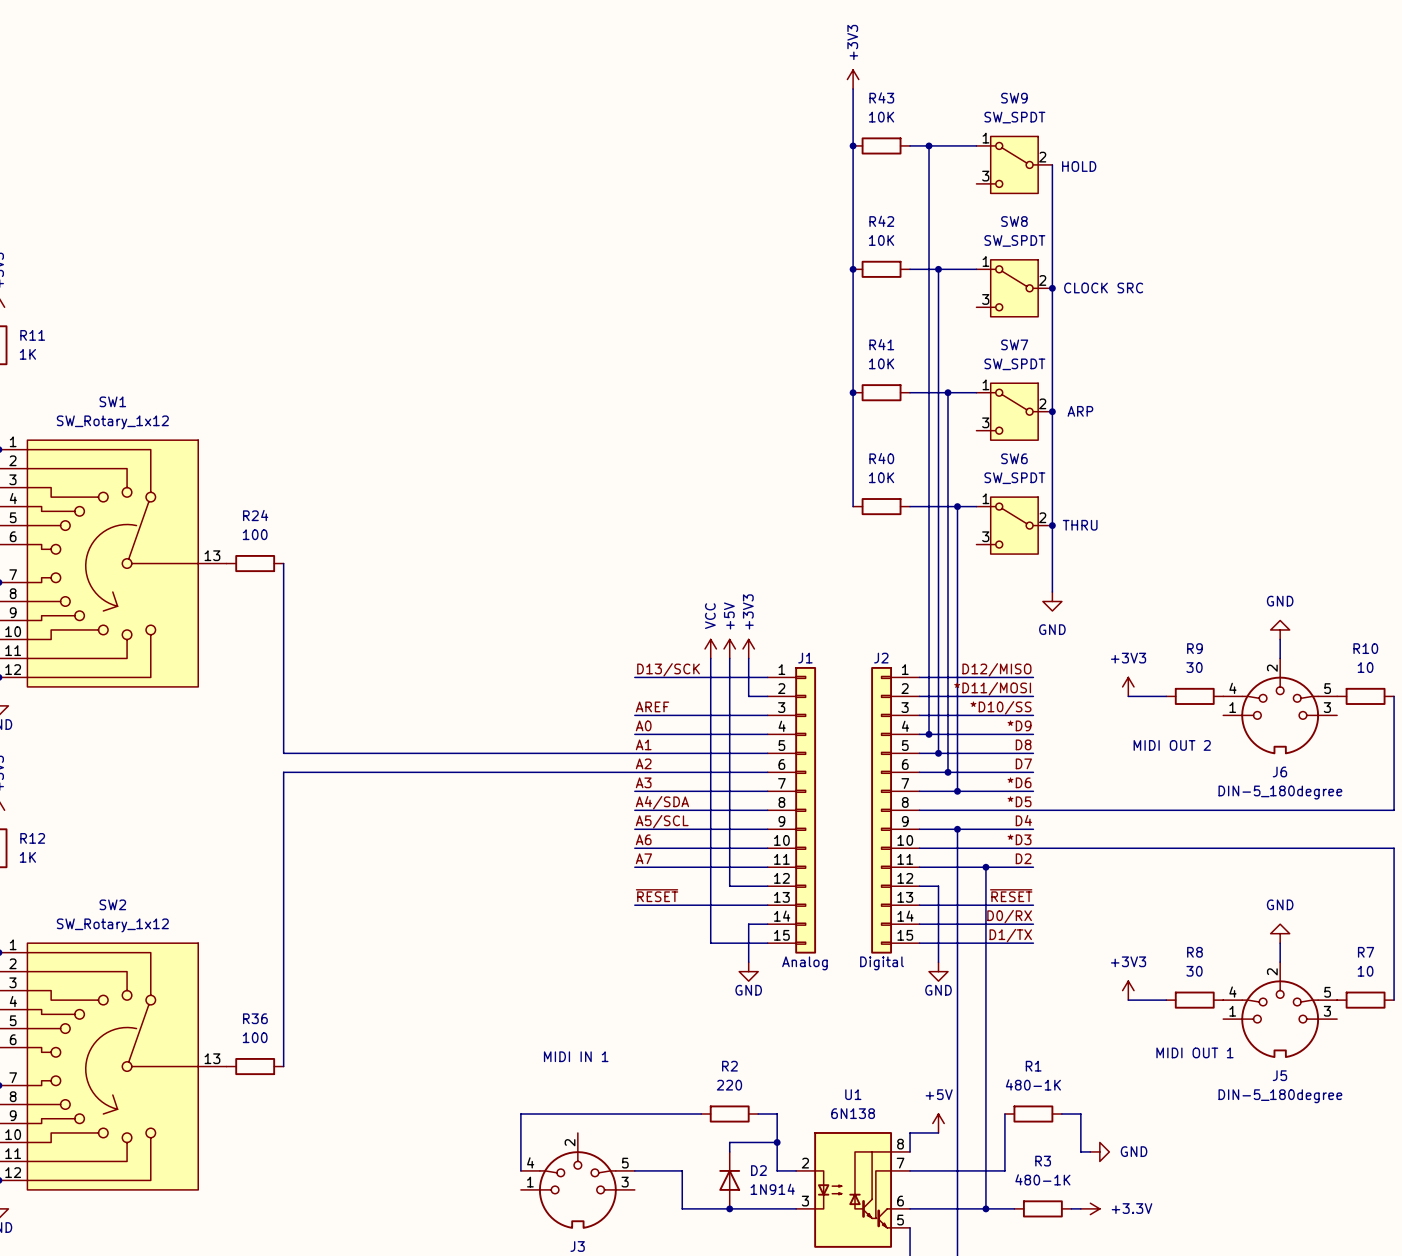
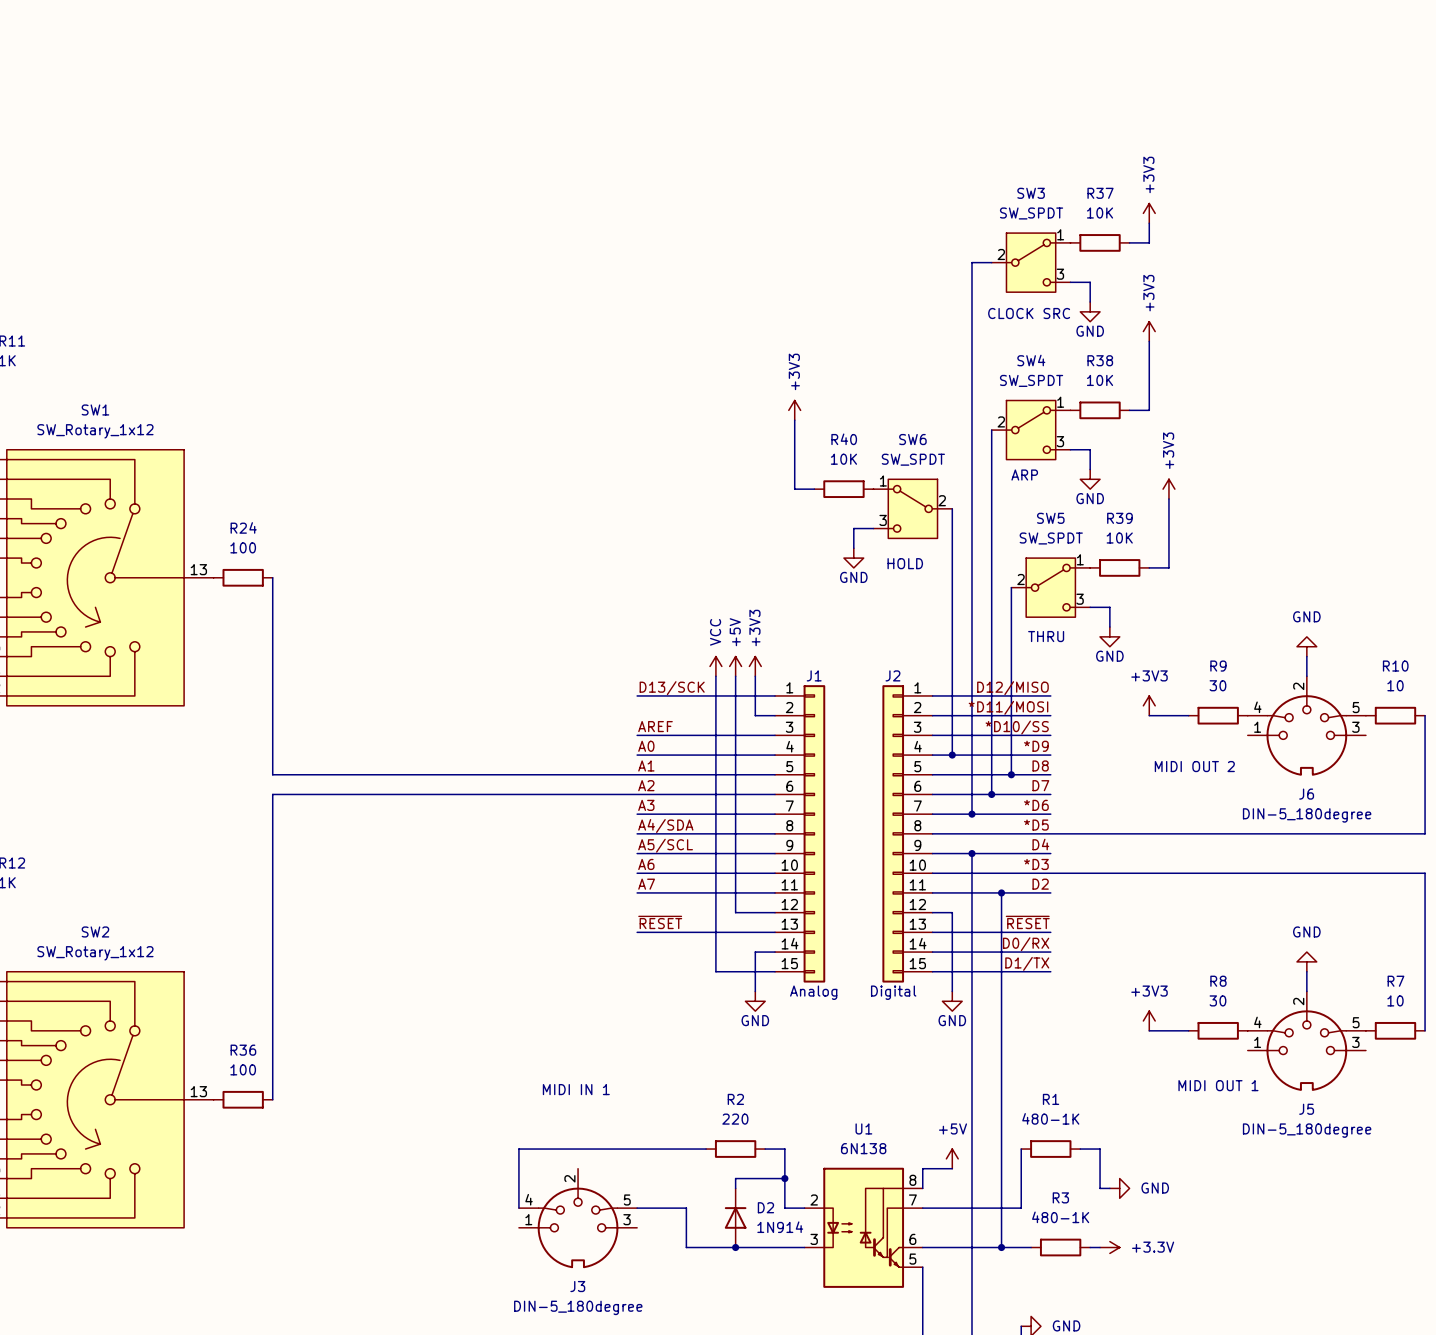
power symbol: +3V3 (853, 79) -> none
wire: (853, 89) (853, 506) -> none
junction: (853, 145) -> none
R43: 10K (881, 145) -> none
wire: (910, 145) (976, 145) -> none
wire: (929, 145) (929, 734) -> none
junction: (929, 145) -> none
SW9: SW_SPDT (1014, 164) -> none
wire: (1052, 164) (1052, 592) -> none
text: HOLD (1079, 166) -> none
power symbol: none -> +3V3 (1149, 213)
wire: none -> (1149, 223) (1149, 242) (1129, 242)
R37: none -> 10K (1100, 242)
wire: none -> (991, 262) (971, 262) (971, 518)
SW3: none -> SW_SPDT (1031, 262)
junction: (853, 269) -> none
R42: 10K (881, 269) -> none
wire: (910, 269) (976, 269) -> none
wire: (938, 269) (938, 497) -> none
junction: (938, 269) -> none
wire: none -> (1070, 282) (1090, 282) (1090, 302)
text position: CLOCK SRC (1103, 287) -> CLOCK SRC (1029, 313)
SW8: SW_SPDT (1014, 288) -> none
junction: (1052, 288) -> none
power symbol: none -> GND (1090, 311)
power symbol: none -> +3V3 (1149, 331)
wire: none -> (1149, 341) (1149, 410) (1129, 410)
junction: (853, 392) -> none
R41: 10K (881, 392) -> none
wire: (910, 392) (976, 392) -> none
wire: (947, 392) (947, 772) -> none
junction: (947, 392) -> none
power symbol: none -> +3V3 (794, 410)
R38: none -> 10K (1100, 410)
wire: none -> (794, 420) (794, 489) (814, 489)
SW7: SW_SPDT (1014, 411) -> none
junction: (1052, 411) -> none
text position: ARP (1080, 411) -> ARP (1024, 475)
wire: none -> (991, 430) (991, 794)
SW4: none -> SW_SPDT (1031, 430)
wire: none -> (1070, 449) (1090, 449) (1090, 469)
power symbol: none -> GND (1090, 479)
power symbol: none -> +3V3 (1168, 489)
wire: none -> (1168, 499) (1168, 567) (1149, 567)
R40 position: (881, 506) -> (843, 489)
wire: (910, 506) (976, 506) -> none
junction: (957, 506) -> none
wire: none -> (873, 528) (853, 528) (853, 548)
SW6 position: (1014, 525) -> (912, 508)
junction: (1052, 525) -> none
text position: THRU (1080, 525) -> THRU (1046, 636)
power symbol: none -> GND (853, 558)
text: none -> HOLD (905, 563)
R39: none -> 10K (1119, 567)
wire: none -> (1011, 587) (1011, 774)
SW5: none -> SW_SPDT (1050, 587)
wire: none -> (1090, 607) (1109, 607) (1109, 627)
power symbol position: GND (1052, 601) -> GND (1109, 636)
power symbol text position: GND (1052, 629) -> GND (1109, 656)
junction: (929, 734) -> none
wire: (938, 734) (938, 753) -> none
junction: none -> (952, 755)
junction: (938, 753) -> none
junction: none -> (1011, 774)
junction: (947, 772) -> none
junction: none -> (991, 794)

